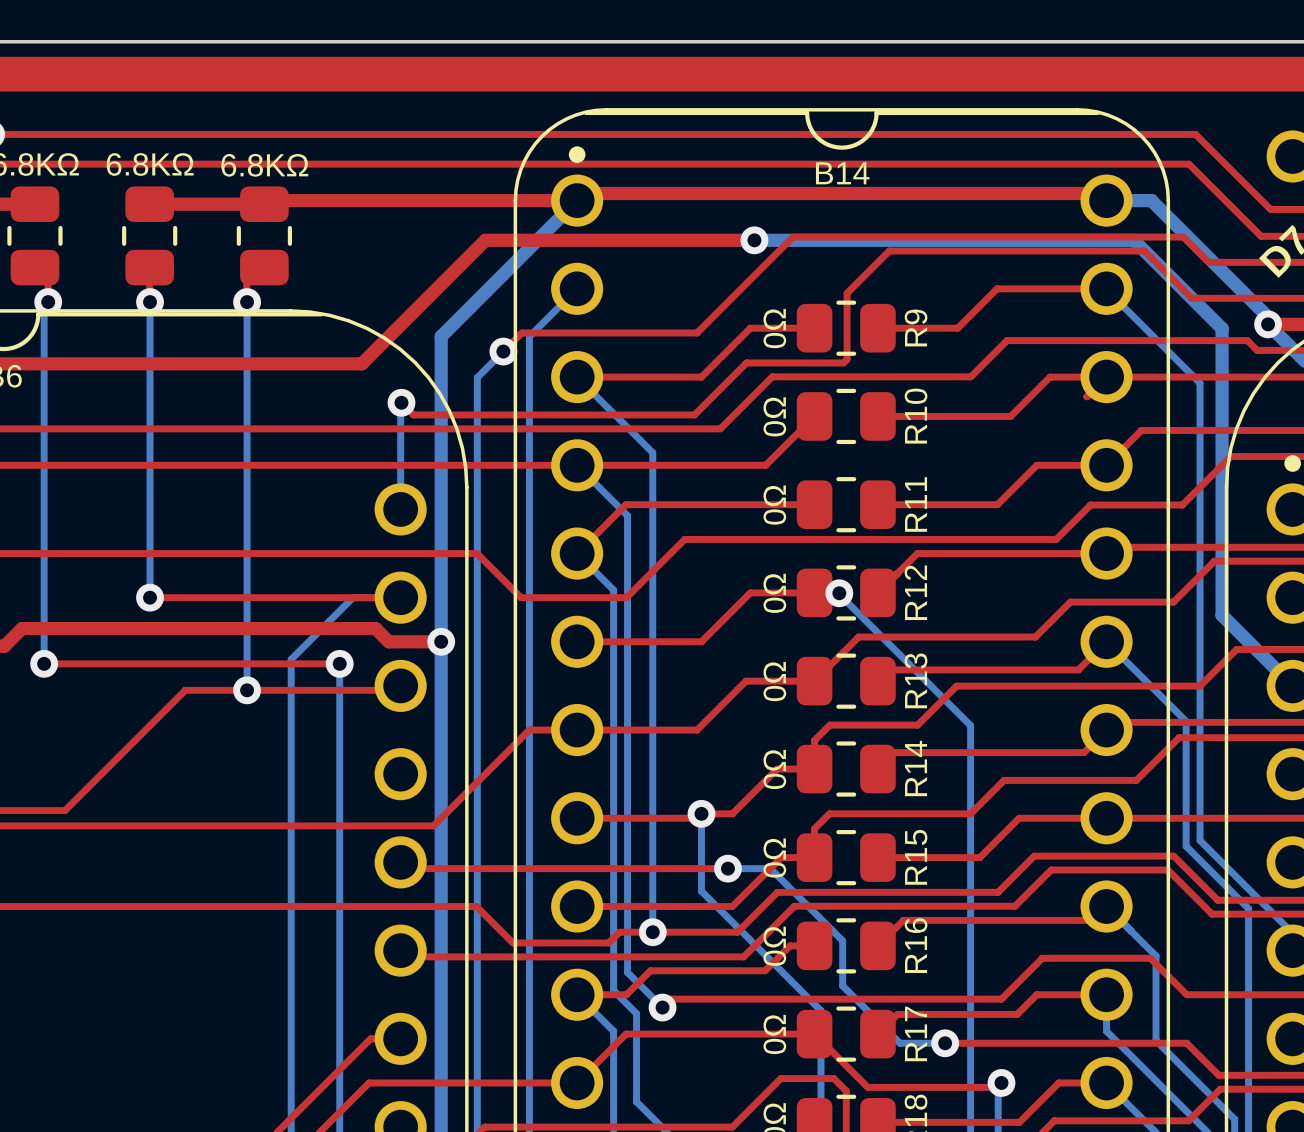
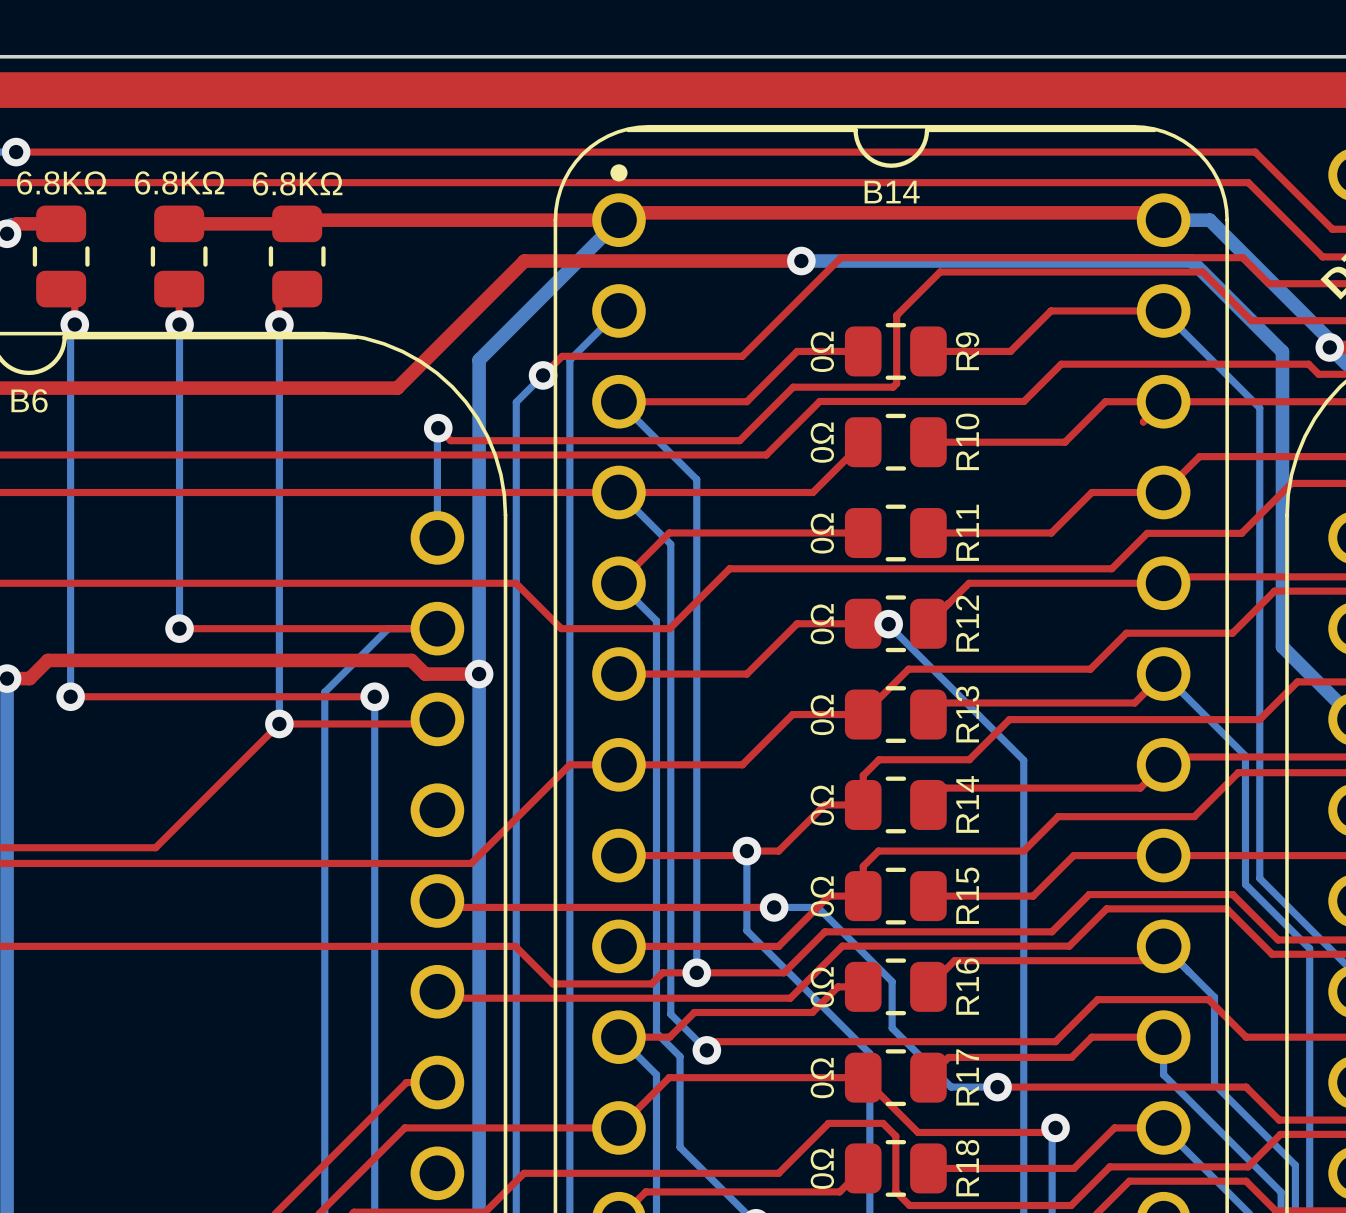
top track: (247, 690) (185, 690) (65, 810) -> (279, 723) (155, 847) (92, 847)

